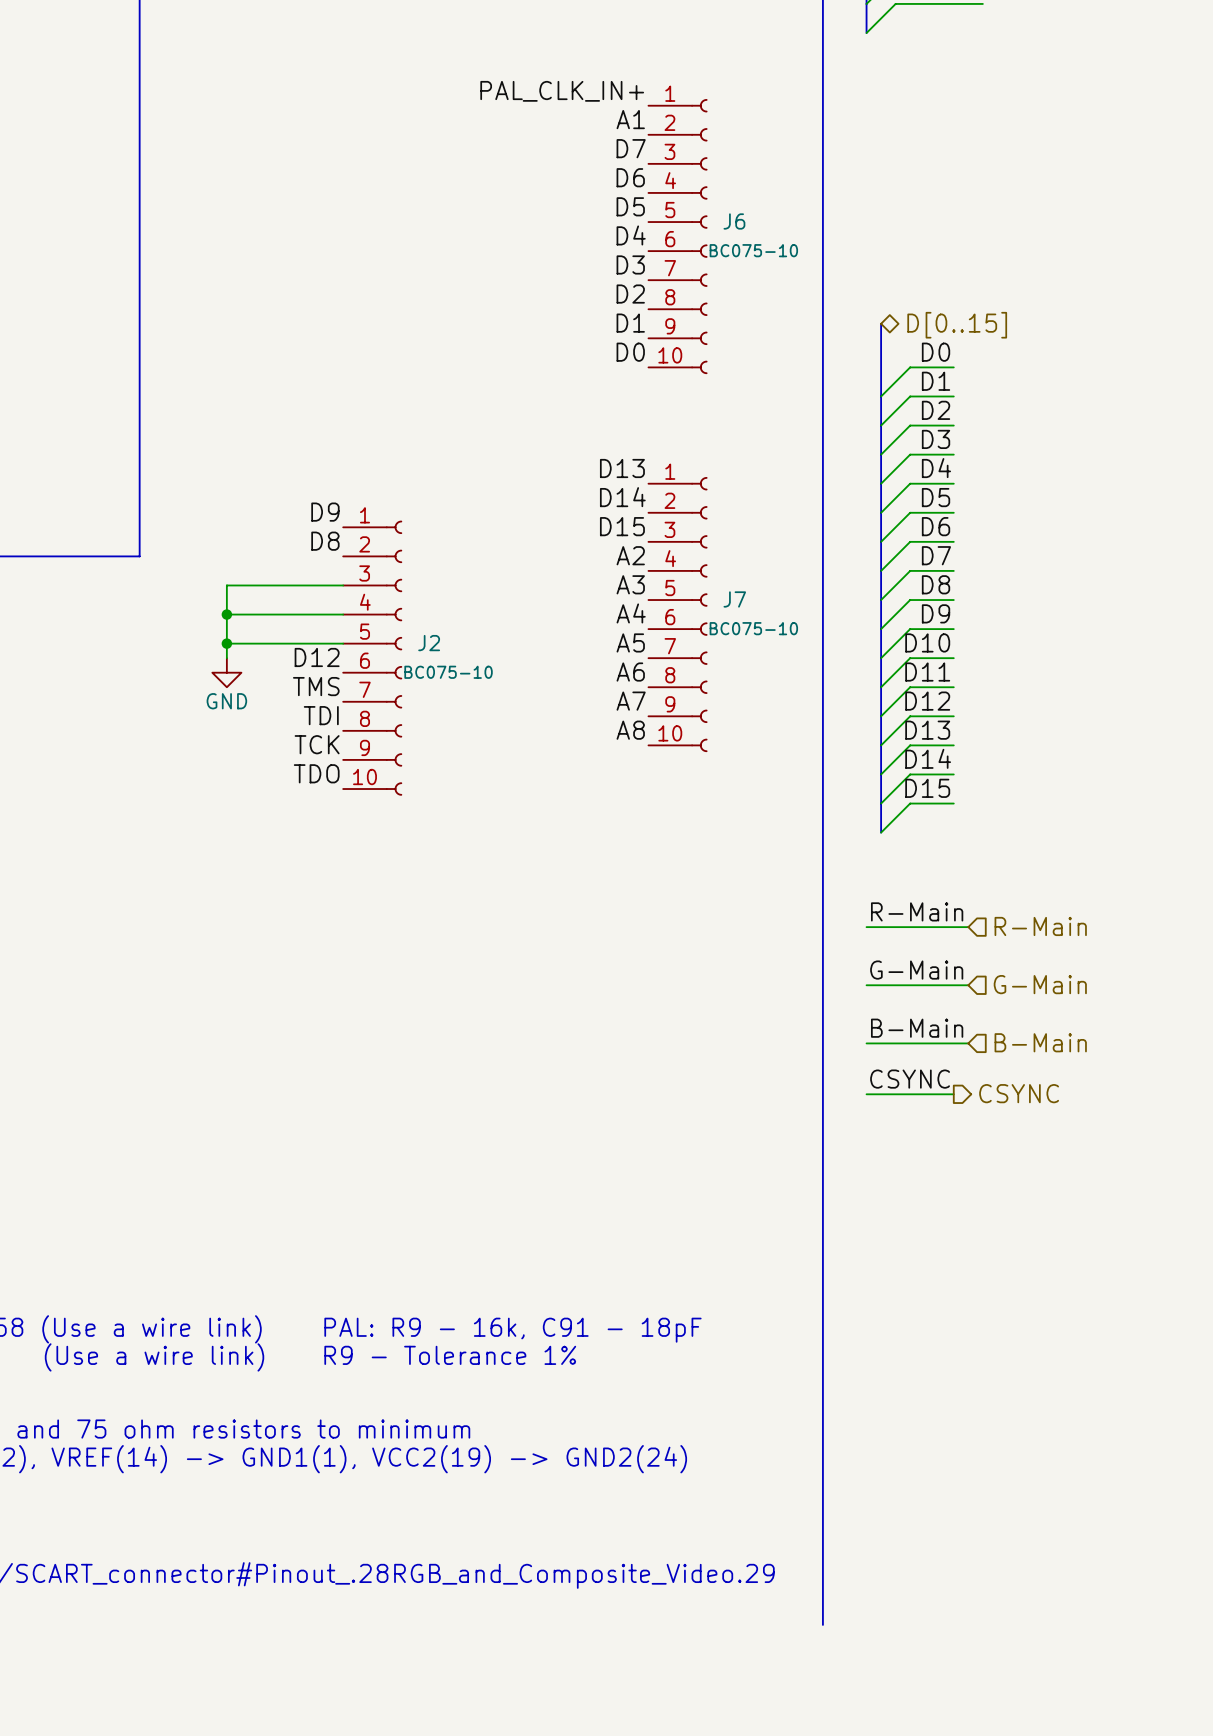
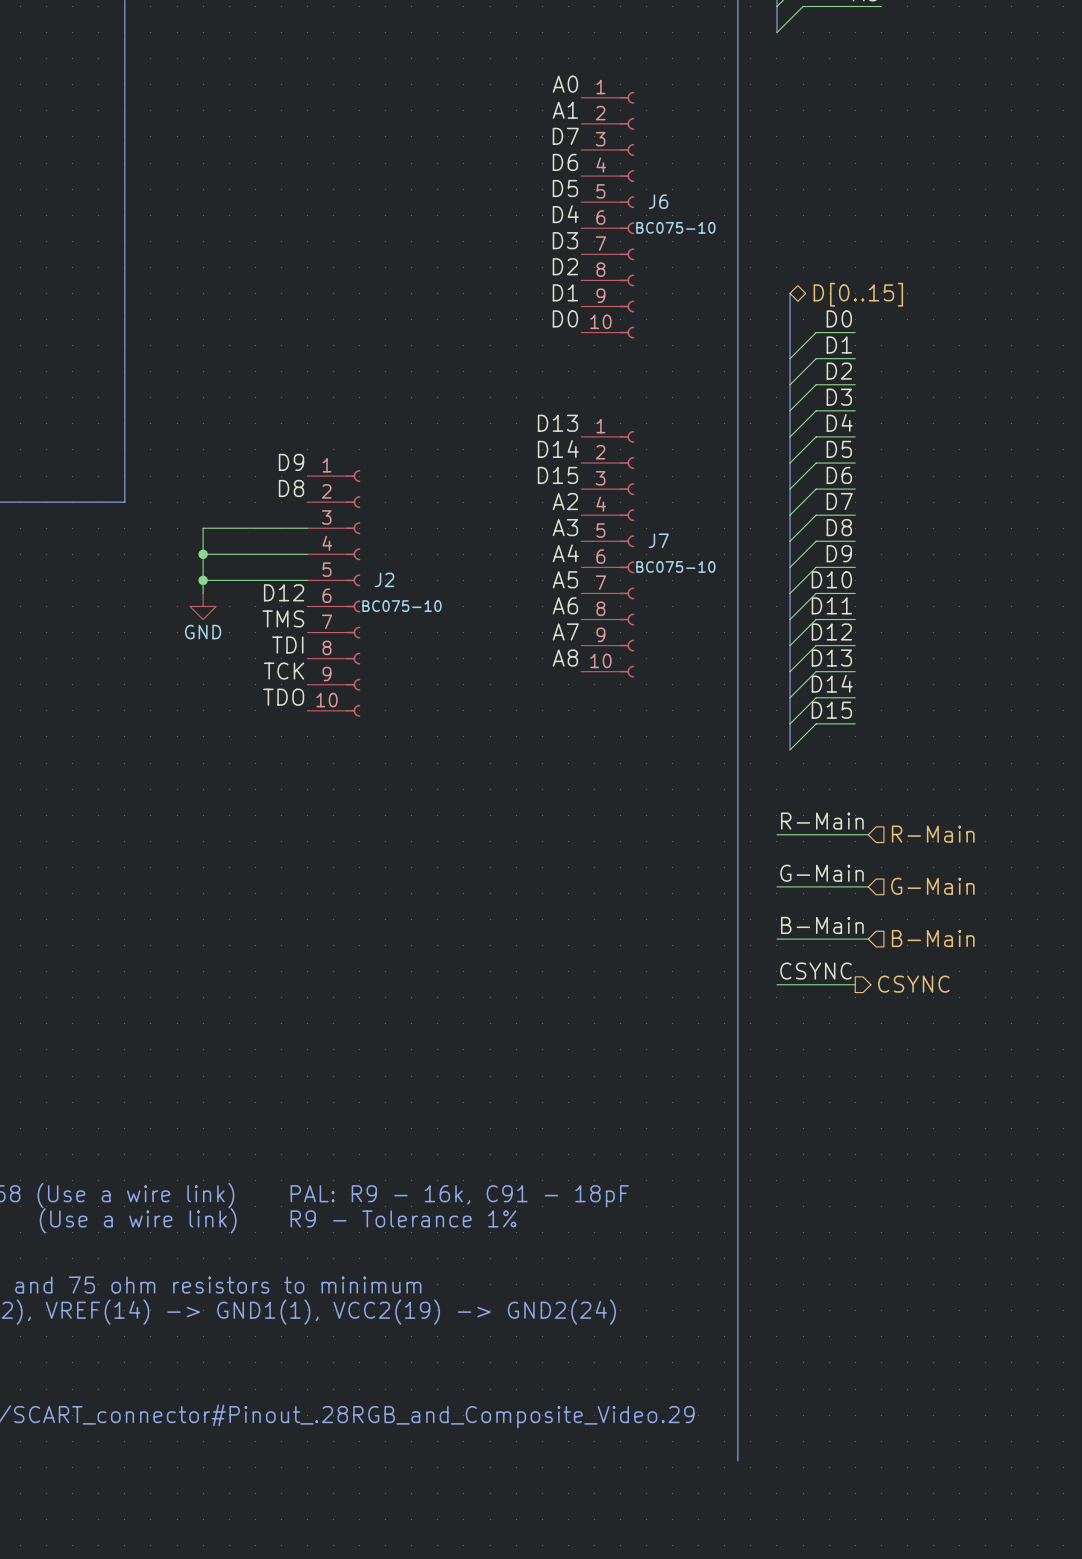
label: PAL_CLK_IN+ (562, 91) -> A0 (565, 84)

